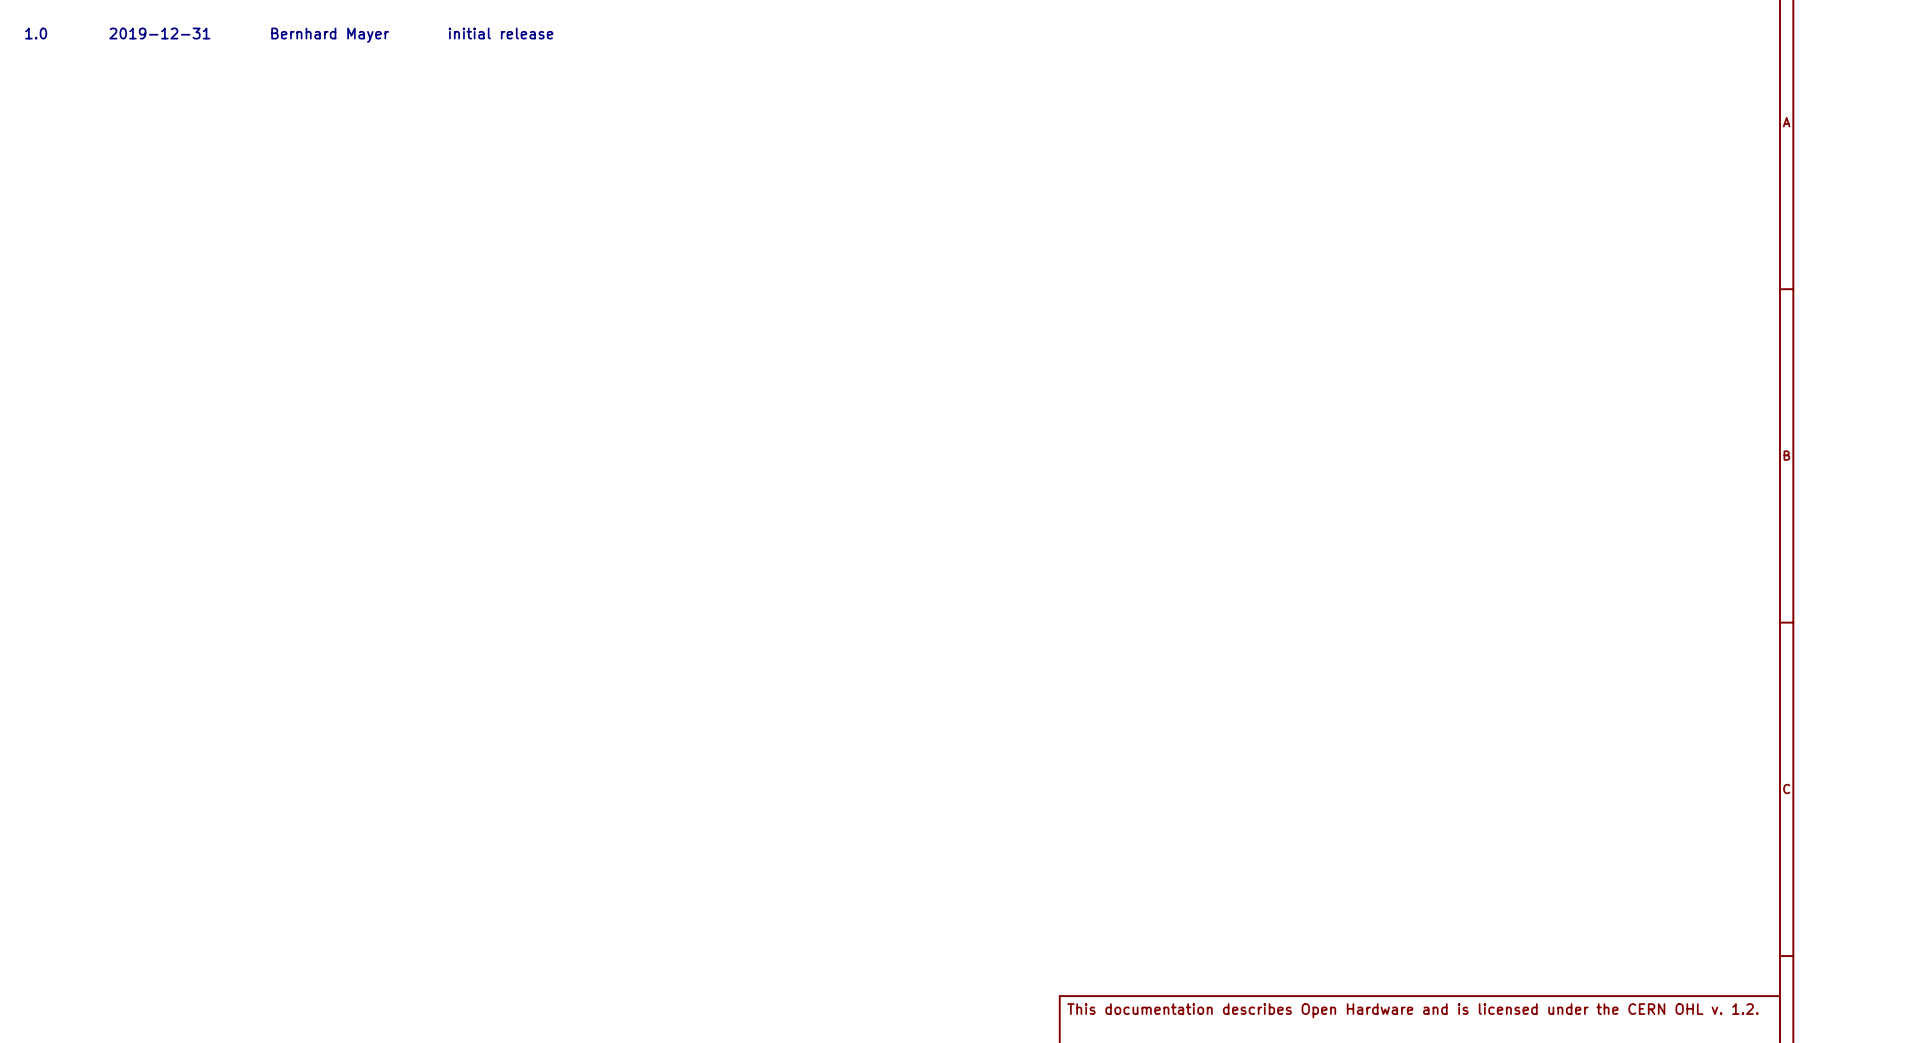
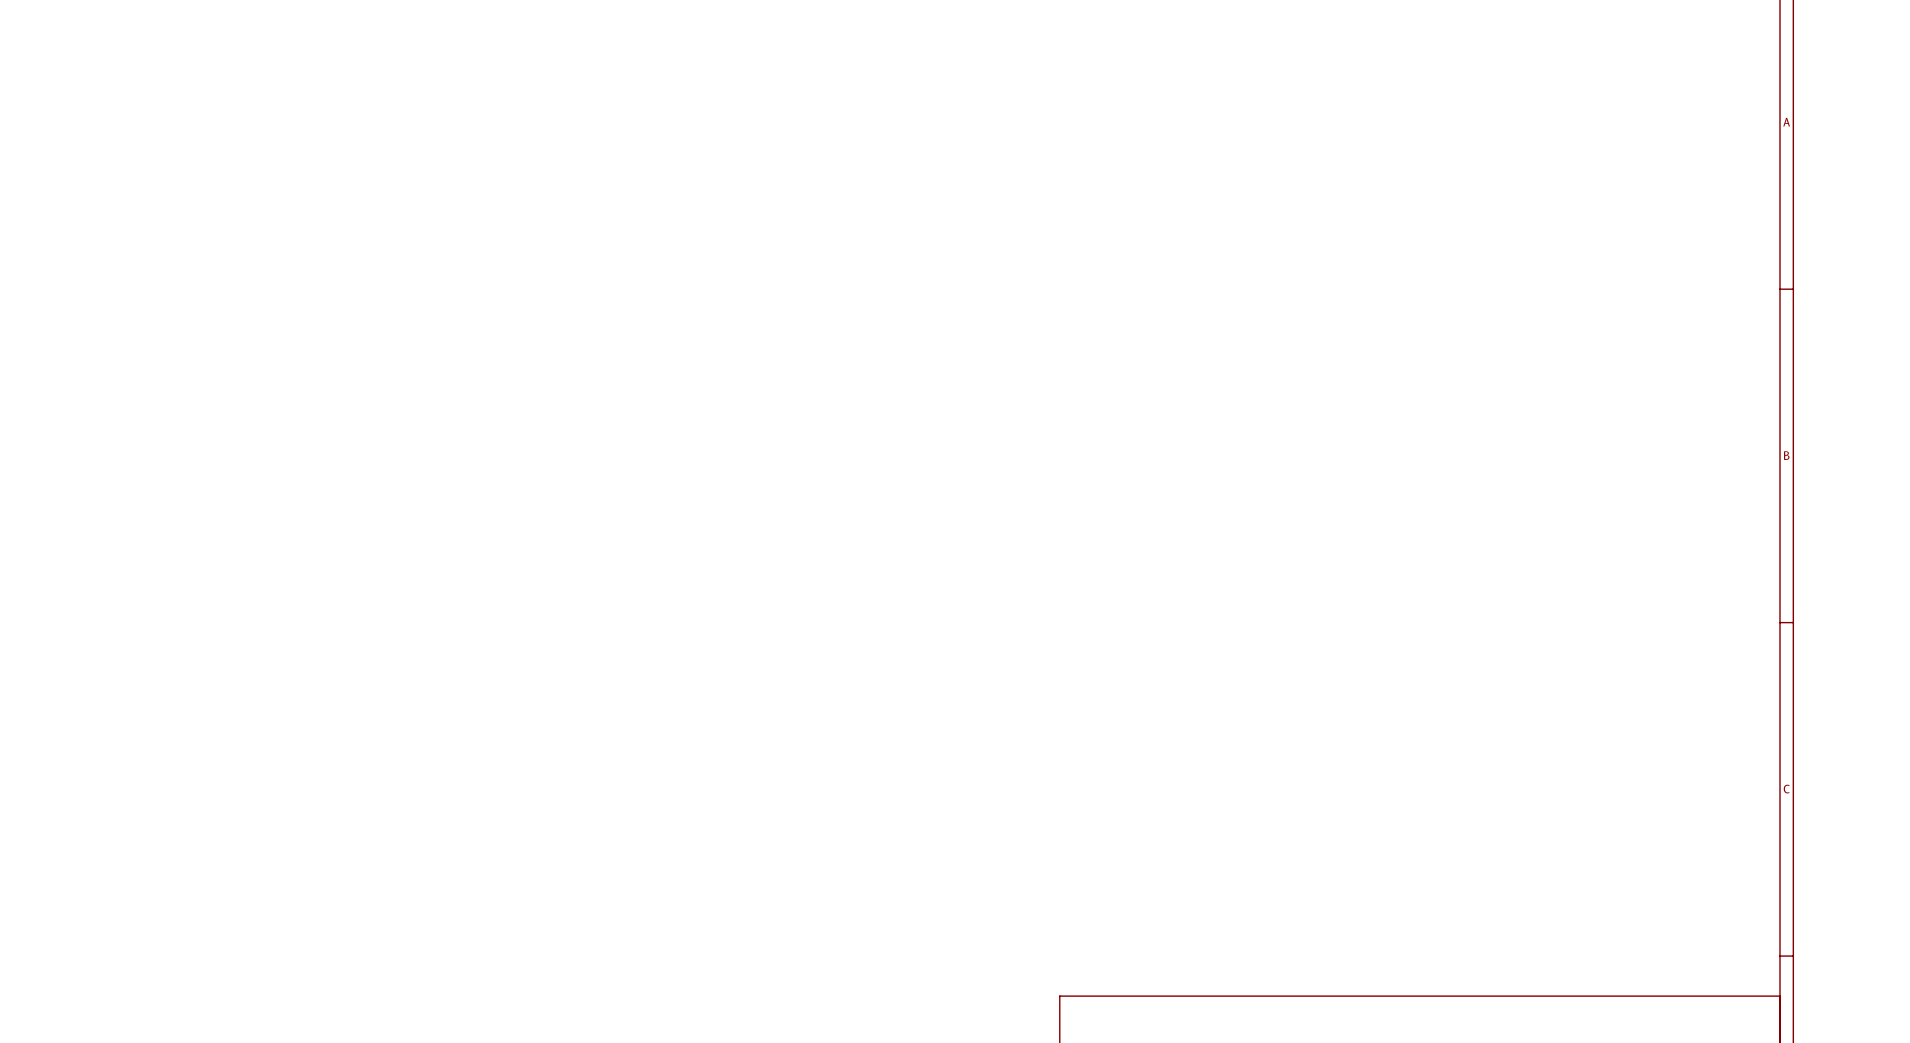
text: 1.0 (36, 33) -> none
text: 2019-12-31 (159, 33) -> none
text: initial release (500, 33) -> none
text: Bernhard Mayer (330, 35) -> none
title block: This documentation describes Open Hardware and is licensed under the CERN OHL v. 1.2. (1412, 1010) -> none

